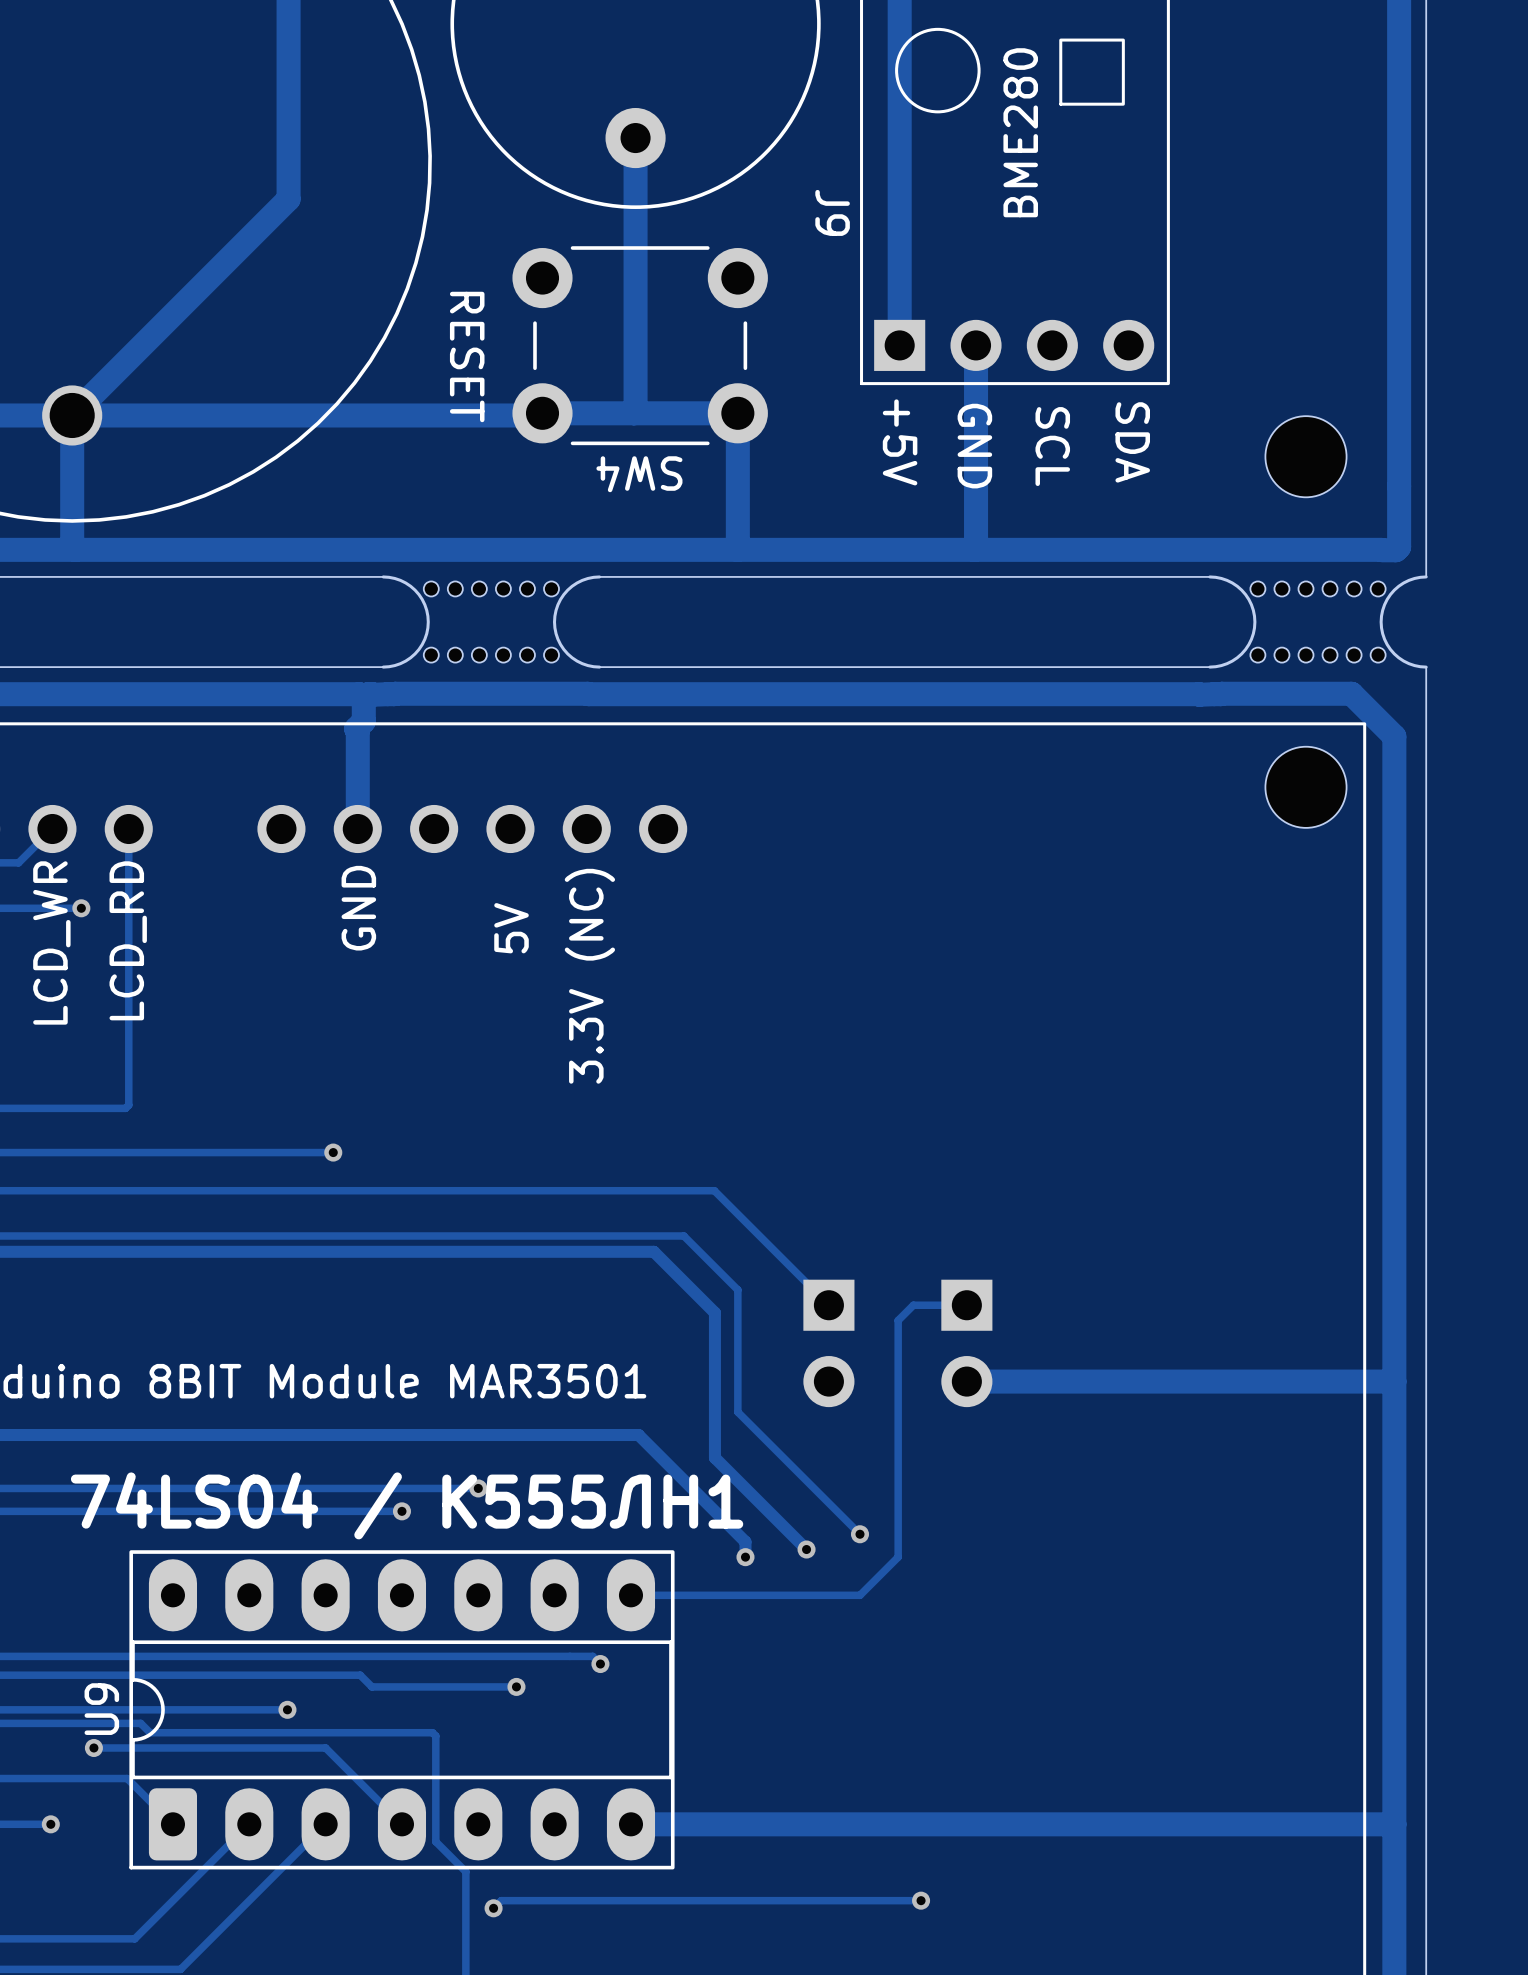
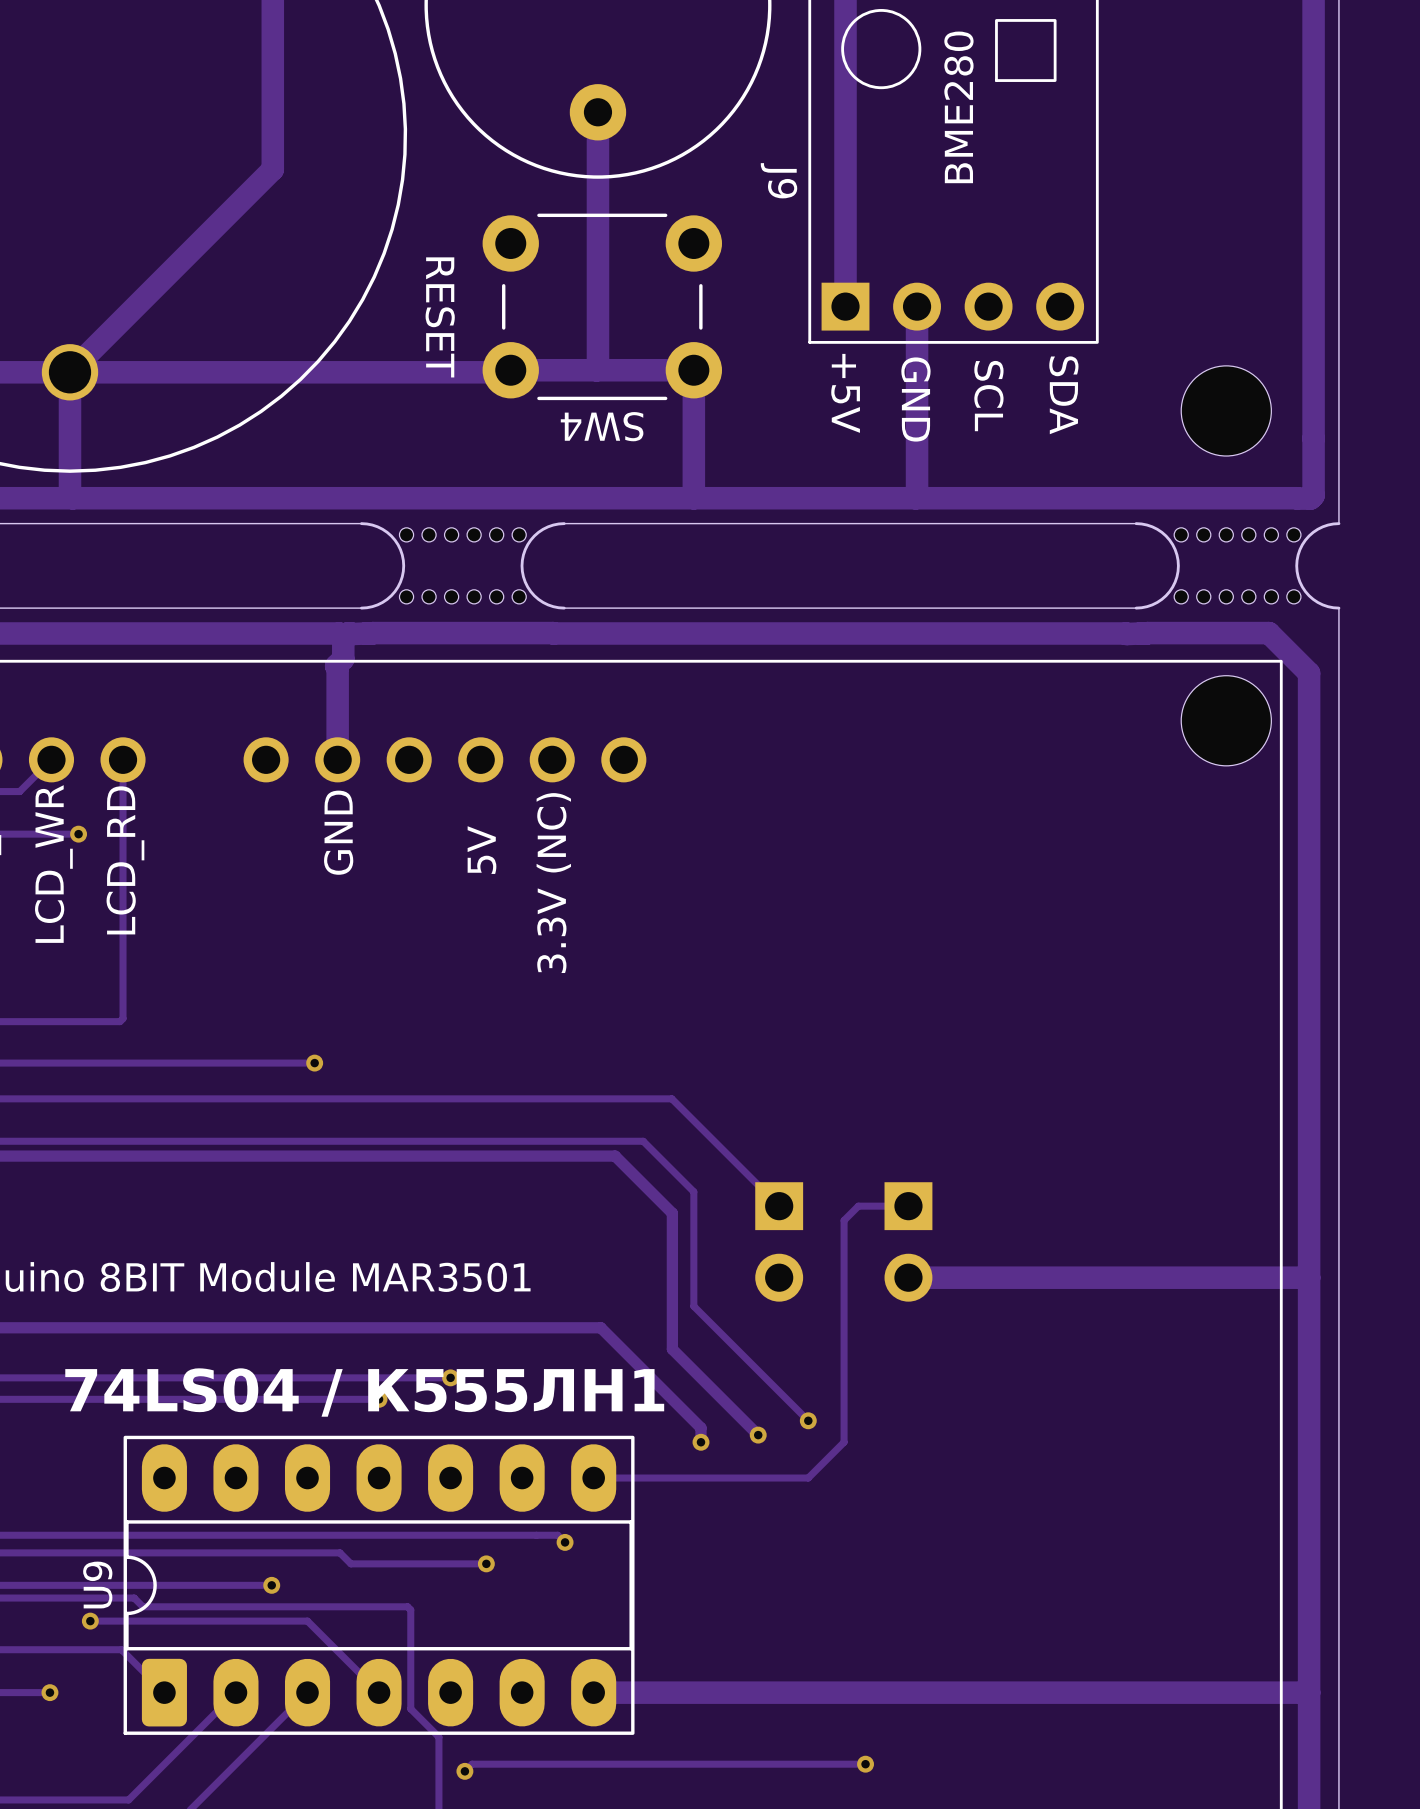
part footprint: [1265, 416, 1347, 498] -> [1181, 365, 1272, 457]
part footprint: [1265, 746, 1347, 828] -> [1181, 675, 1272, 766]

